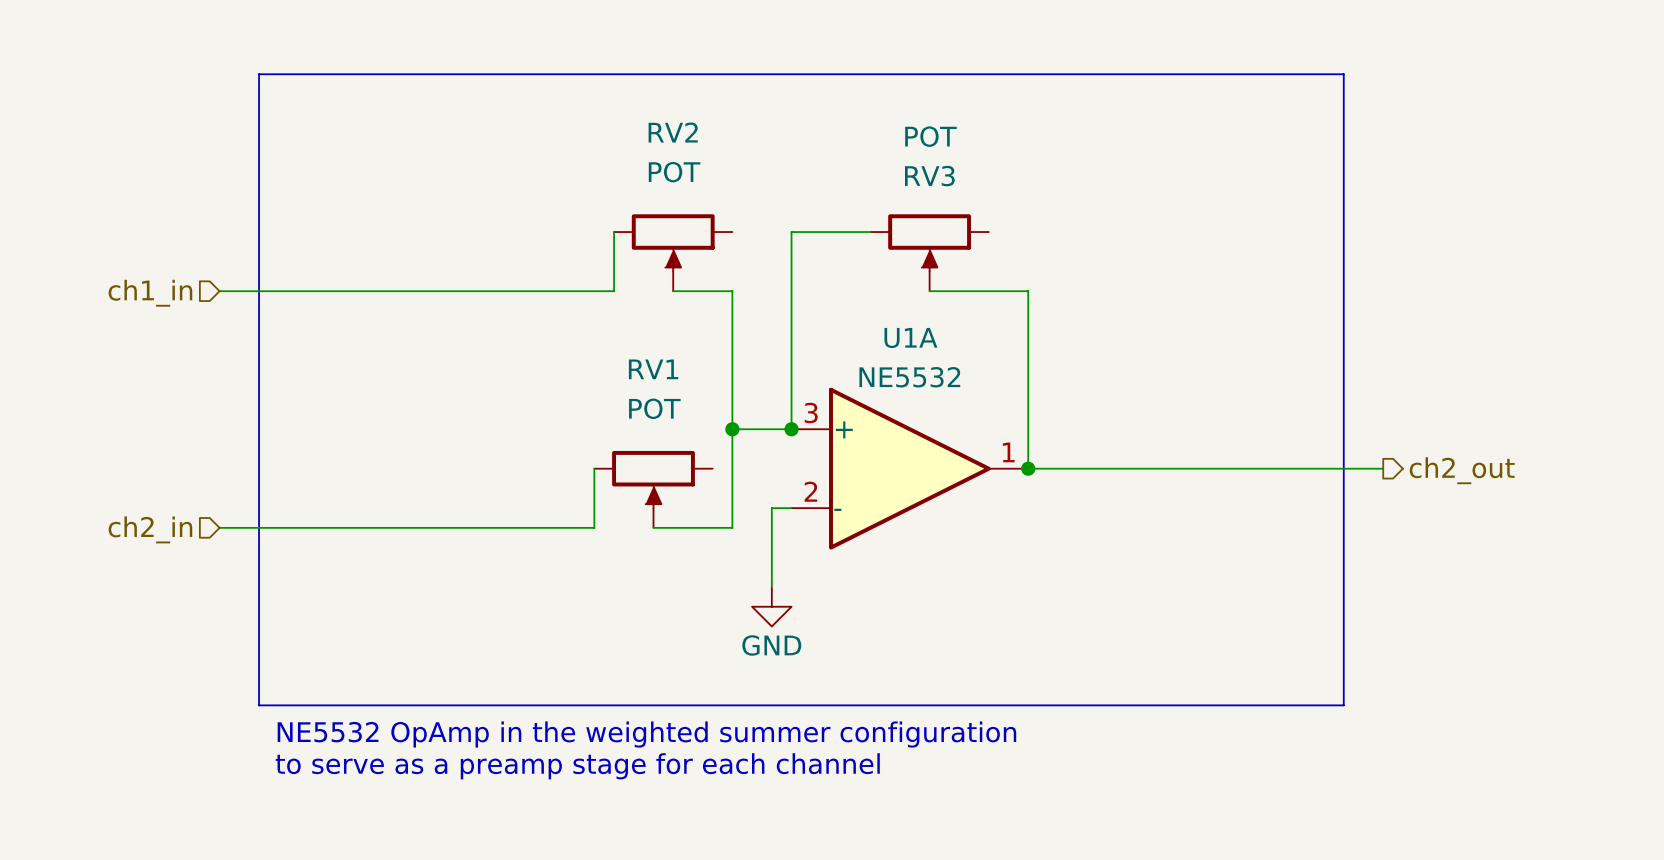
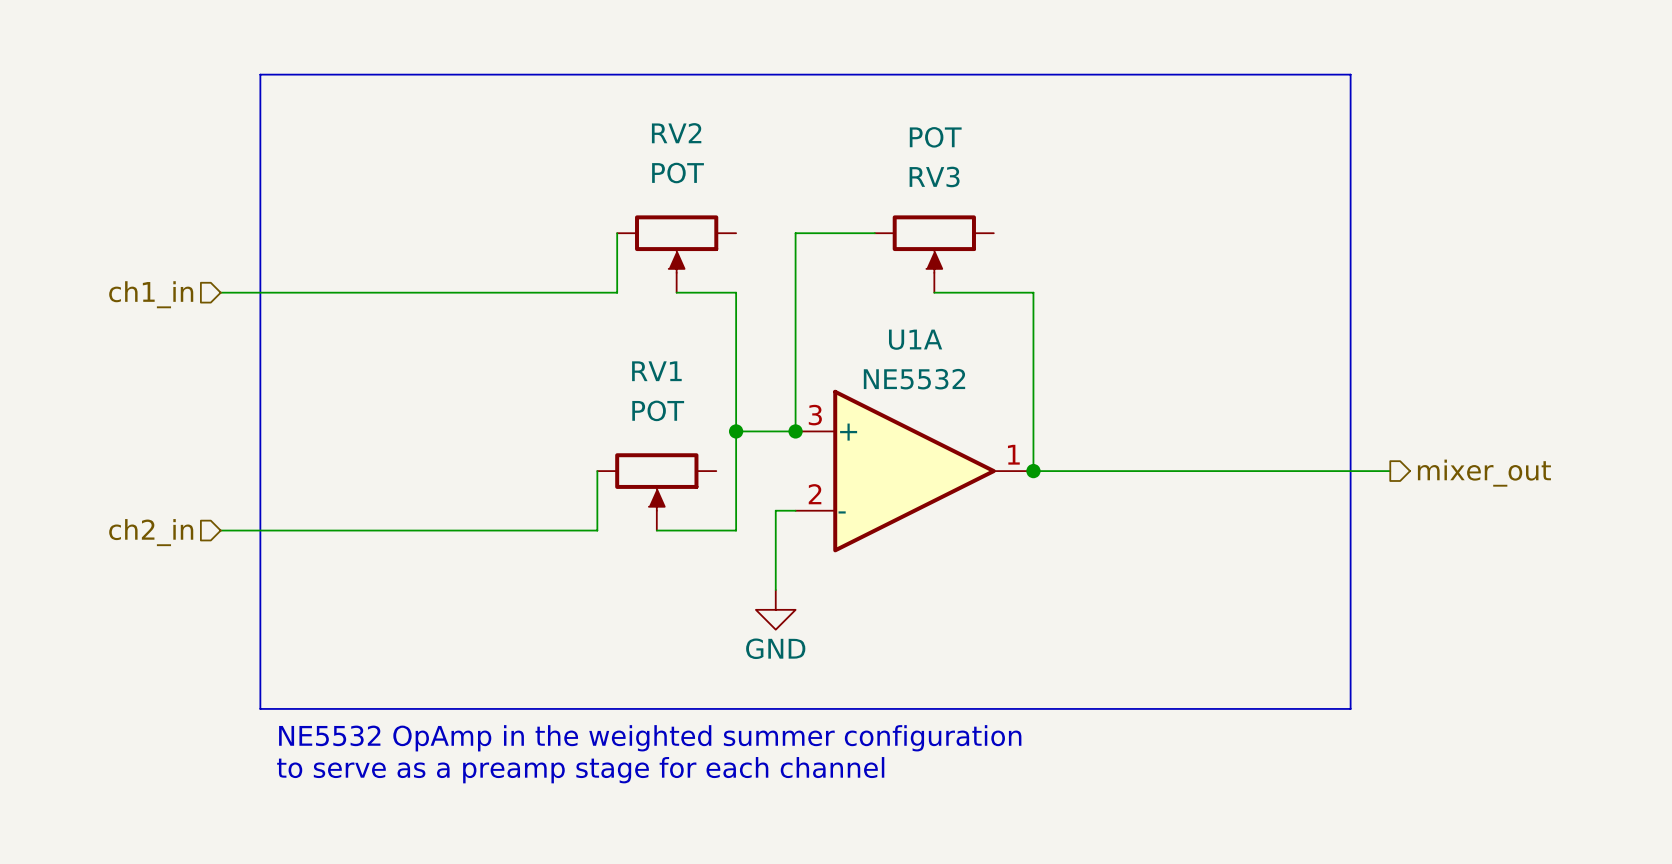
hierarchical label: ch2_out (1462, 470) -> mixer_out (1484, 473)

